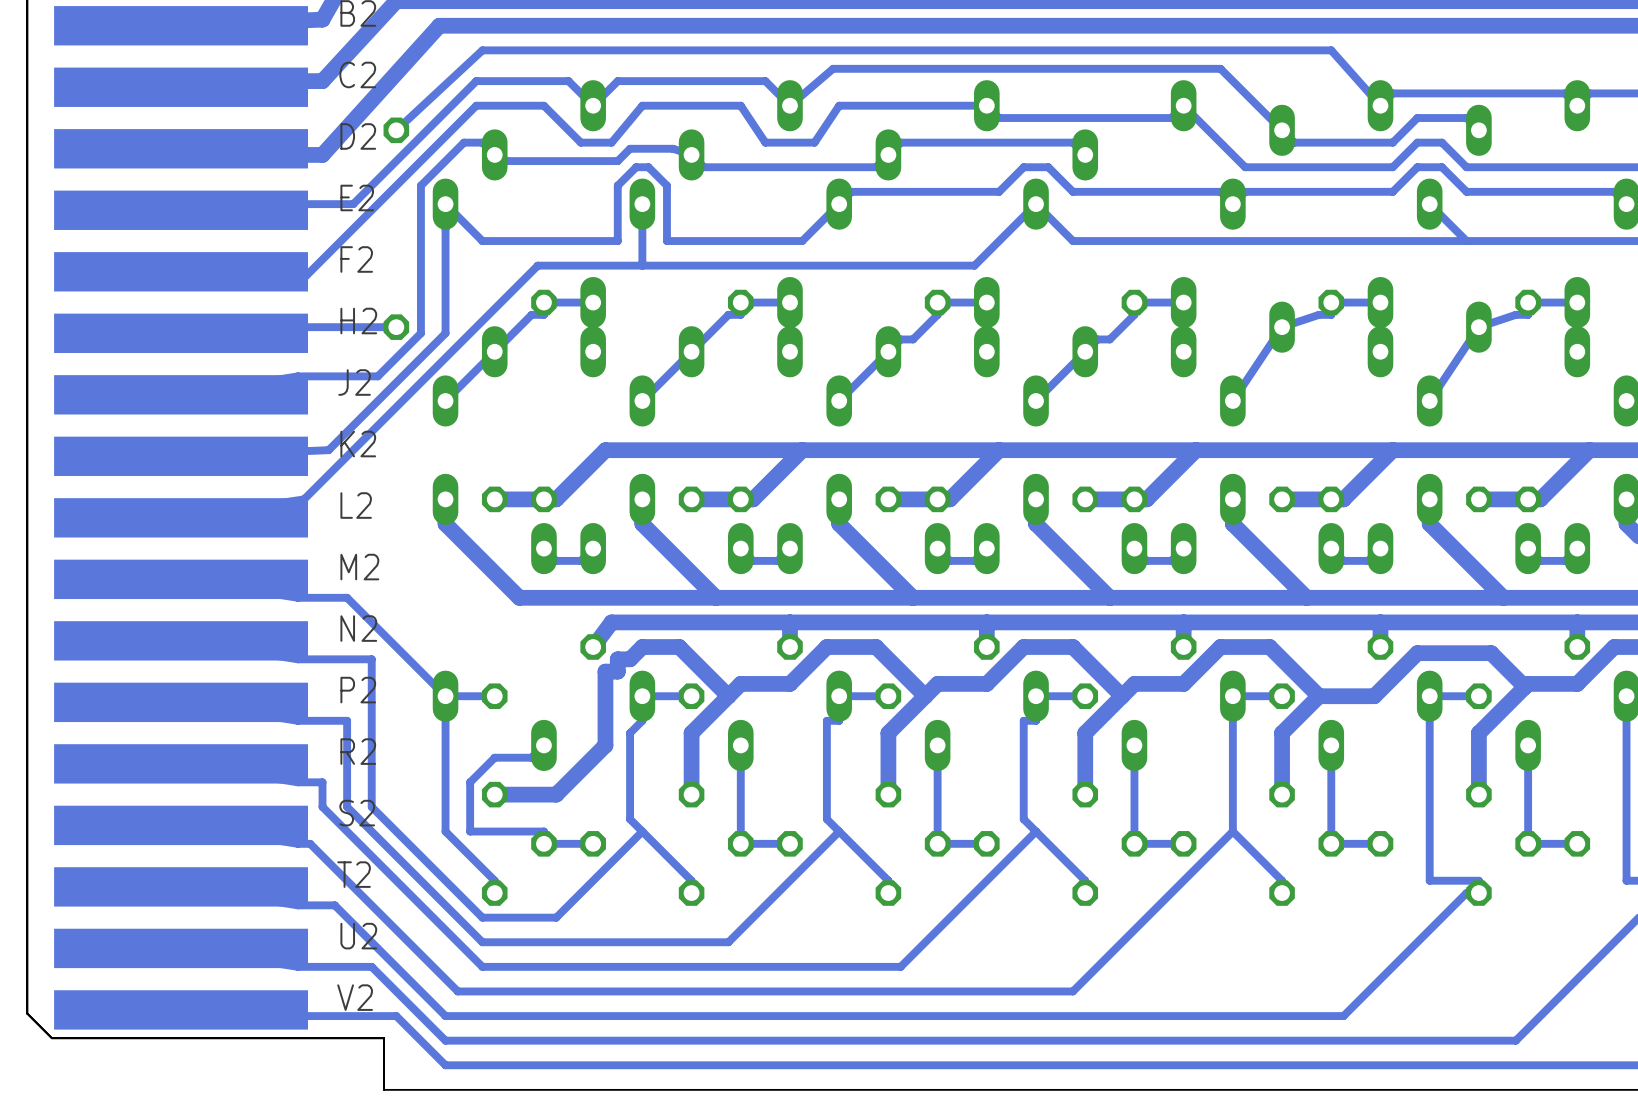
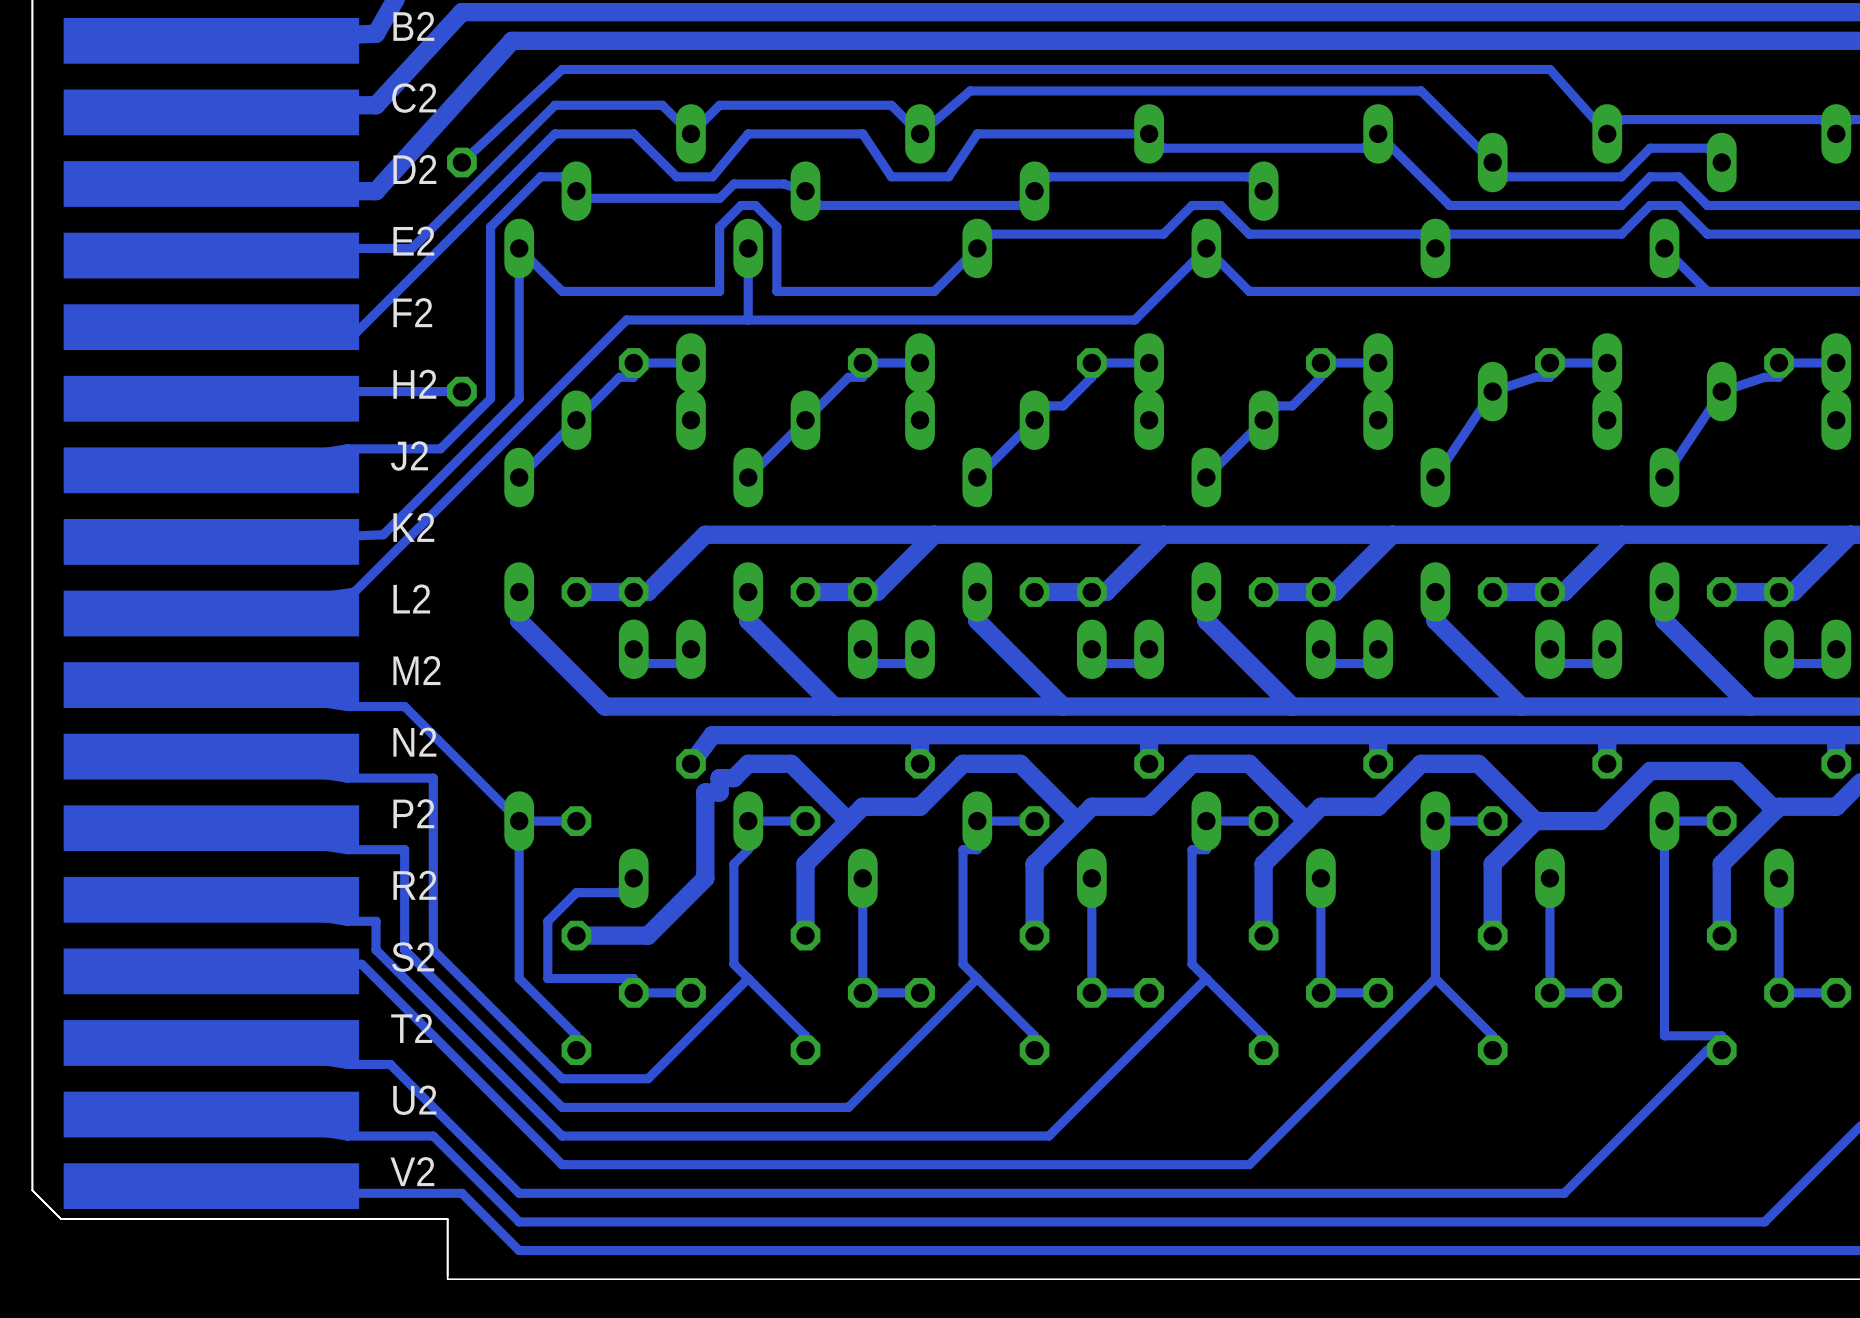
bottom track: (181, 825) (297, 843) (310, 843) (457, 991) (482, 991) -> (211, 971) (361, 964) (562, 1164)

